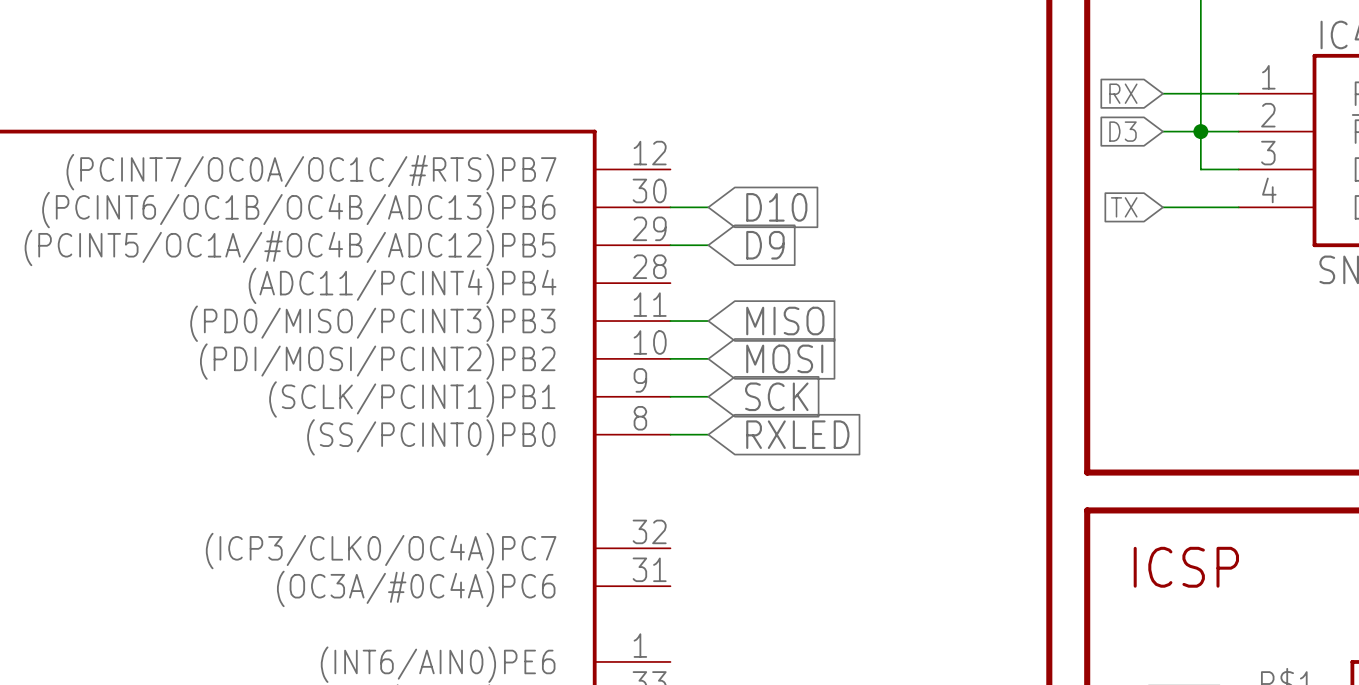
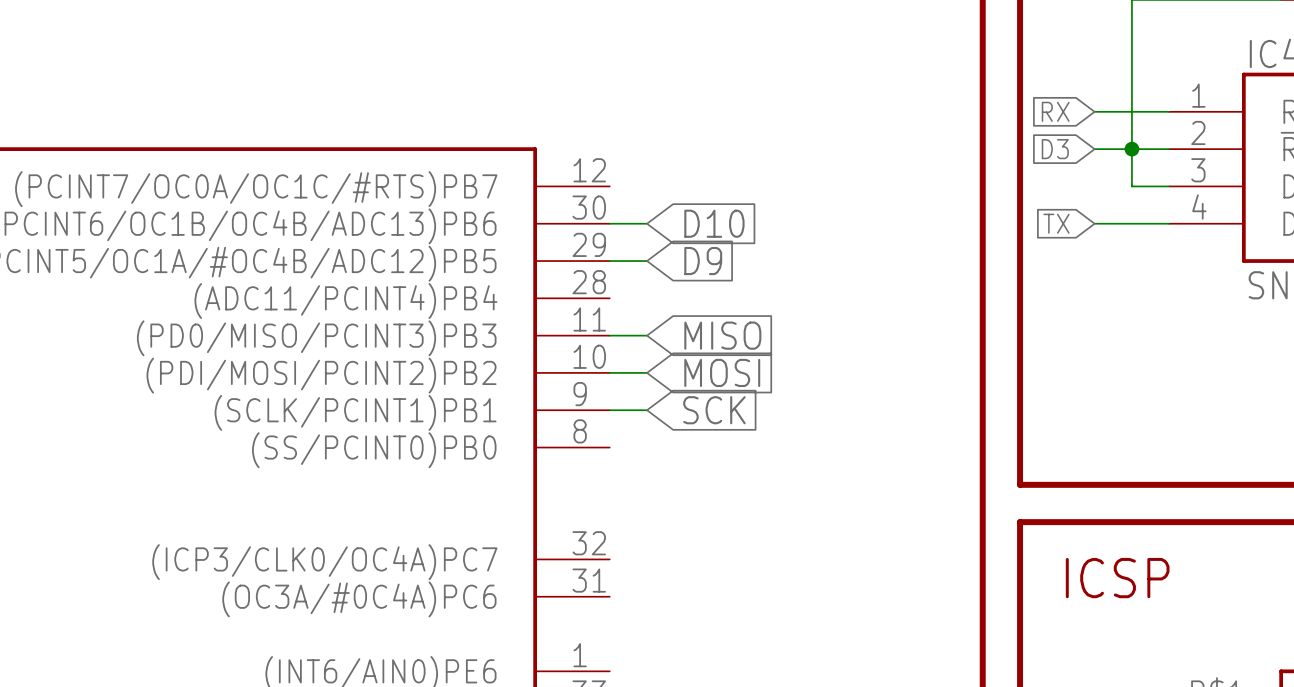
wire: (670, 434) (708, 434) -> none
global label: RXLED (797, 434) -> none

